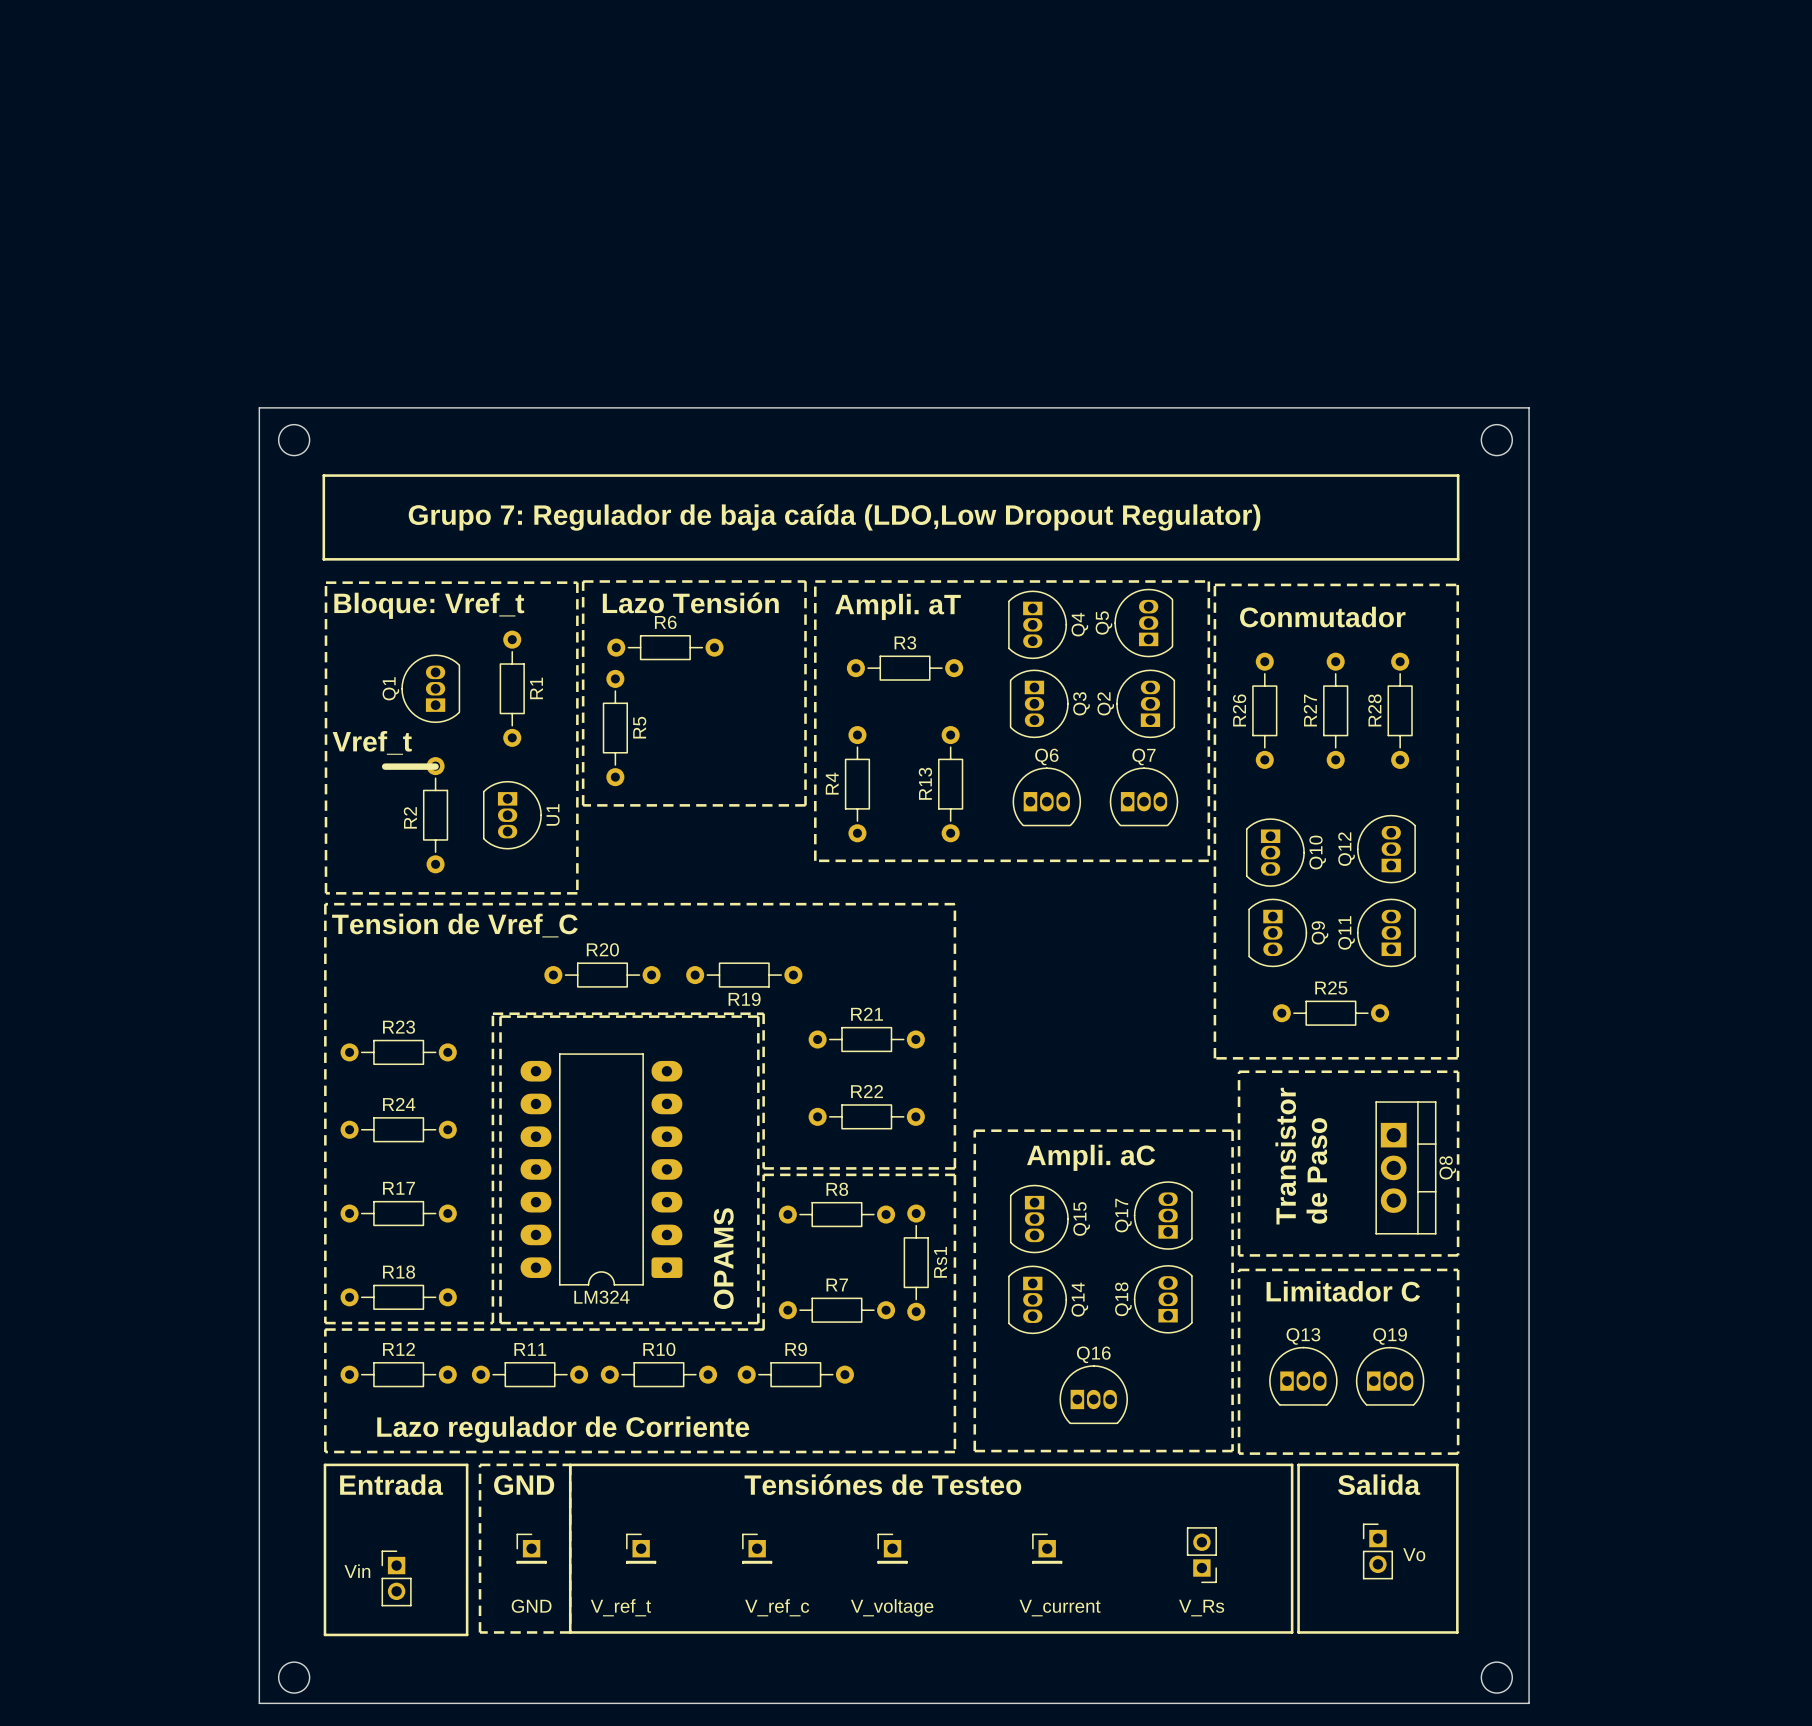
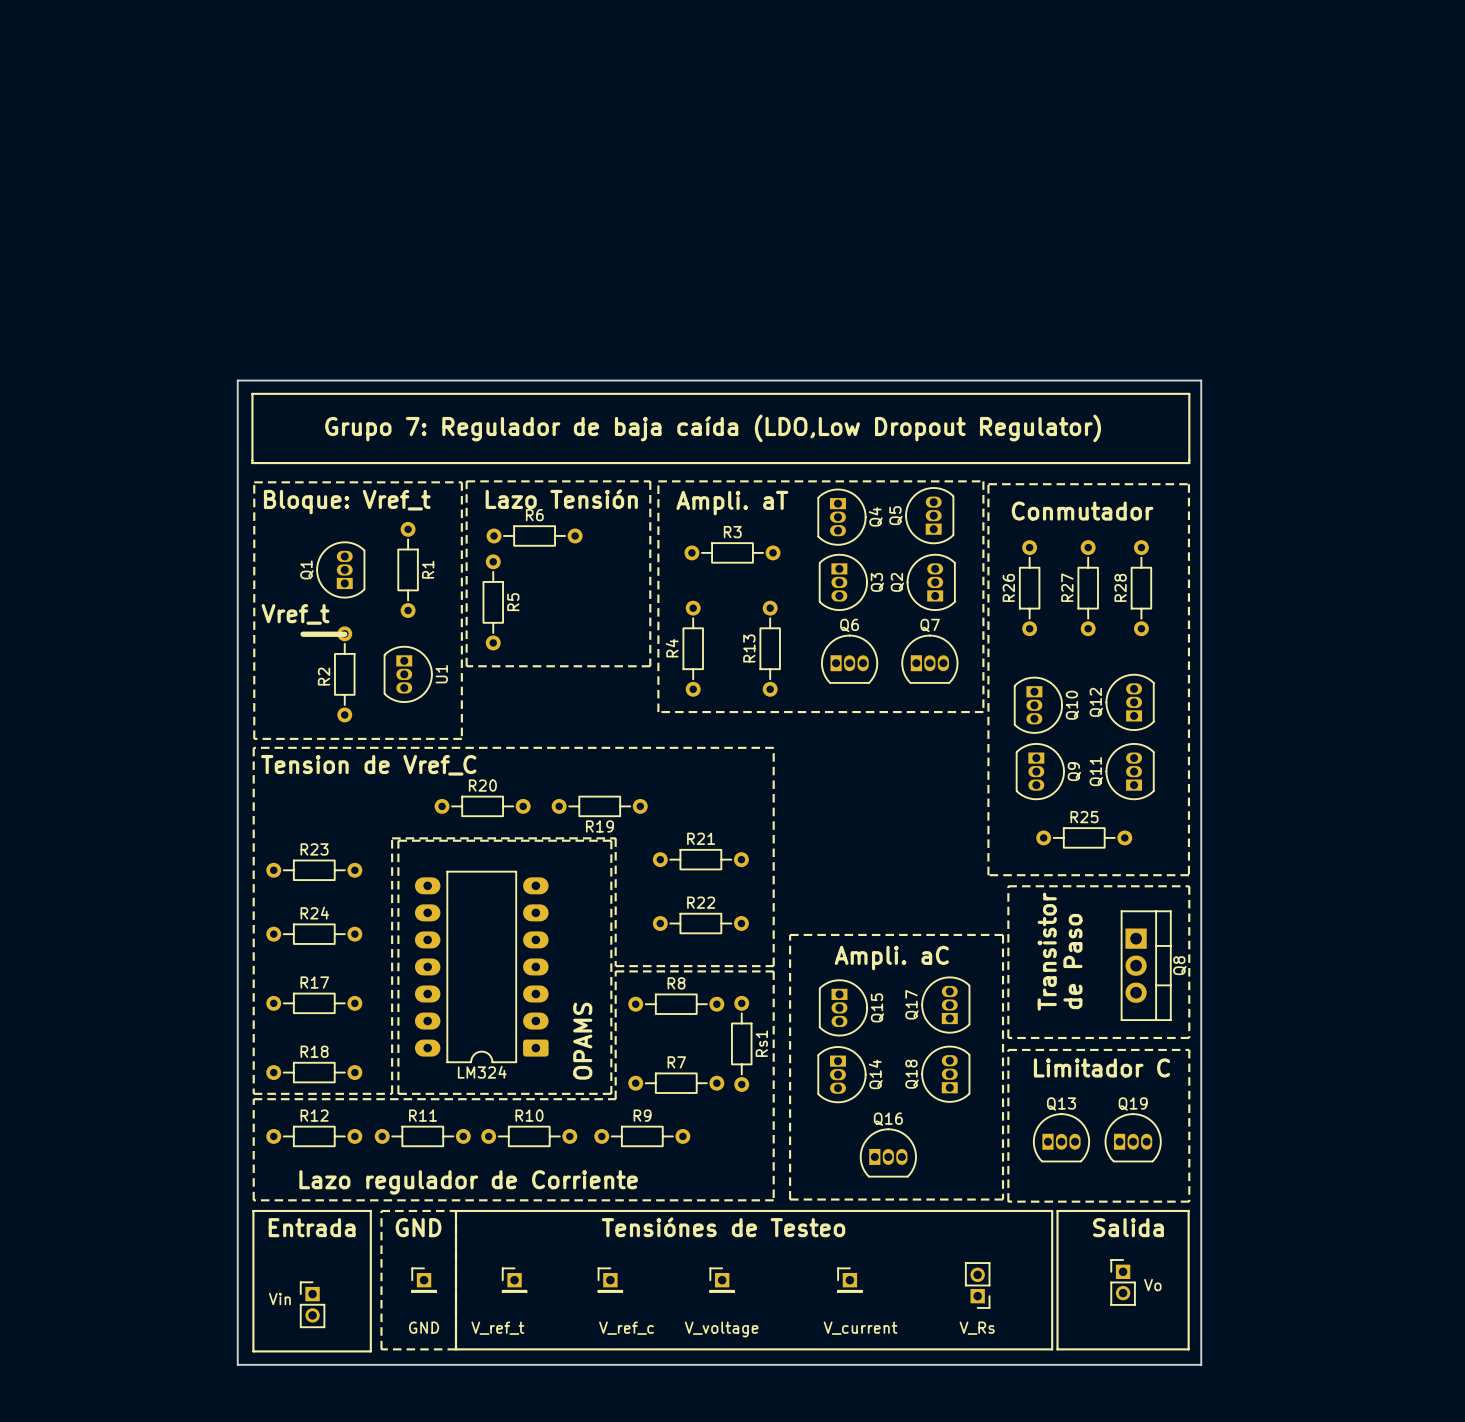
board edge: (259, 407) (1529, 407) (1529, 1703) (259, 1703) (259, 407) -> (237, 380) (237, 1364) (1201, 1364) (1201, 380) (237, 380)
round board edge: [278, 423, 311, 457] -> none
round board edge: [1480, 423, 1513, 457] -> none
round board edge: [278, 1661, 311, 1694] -> none
round board edge: [1480, 1661, 1513, 1694] -> none

